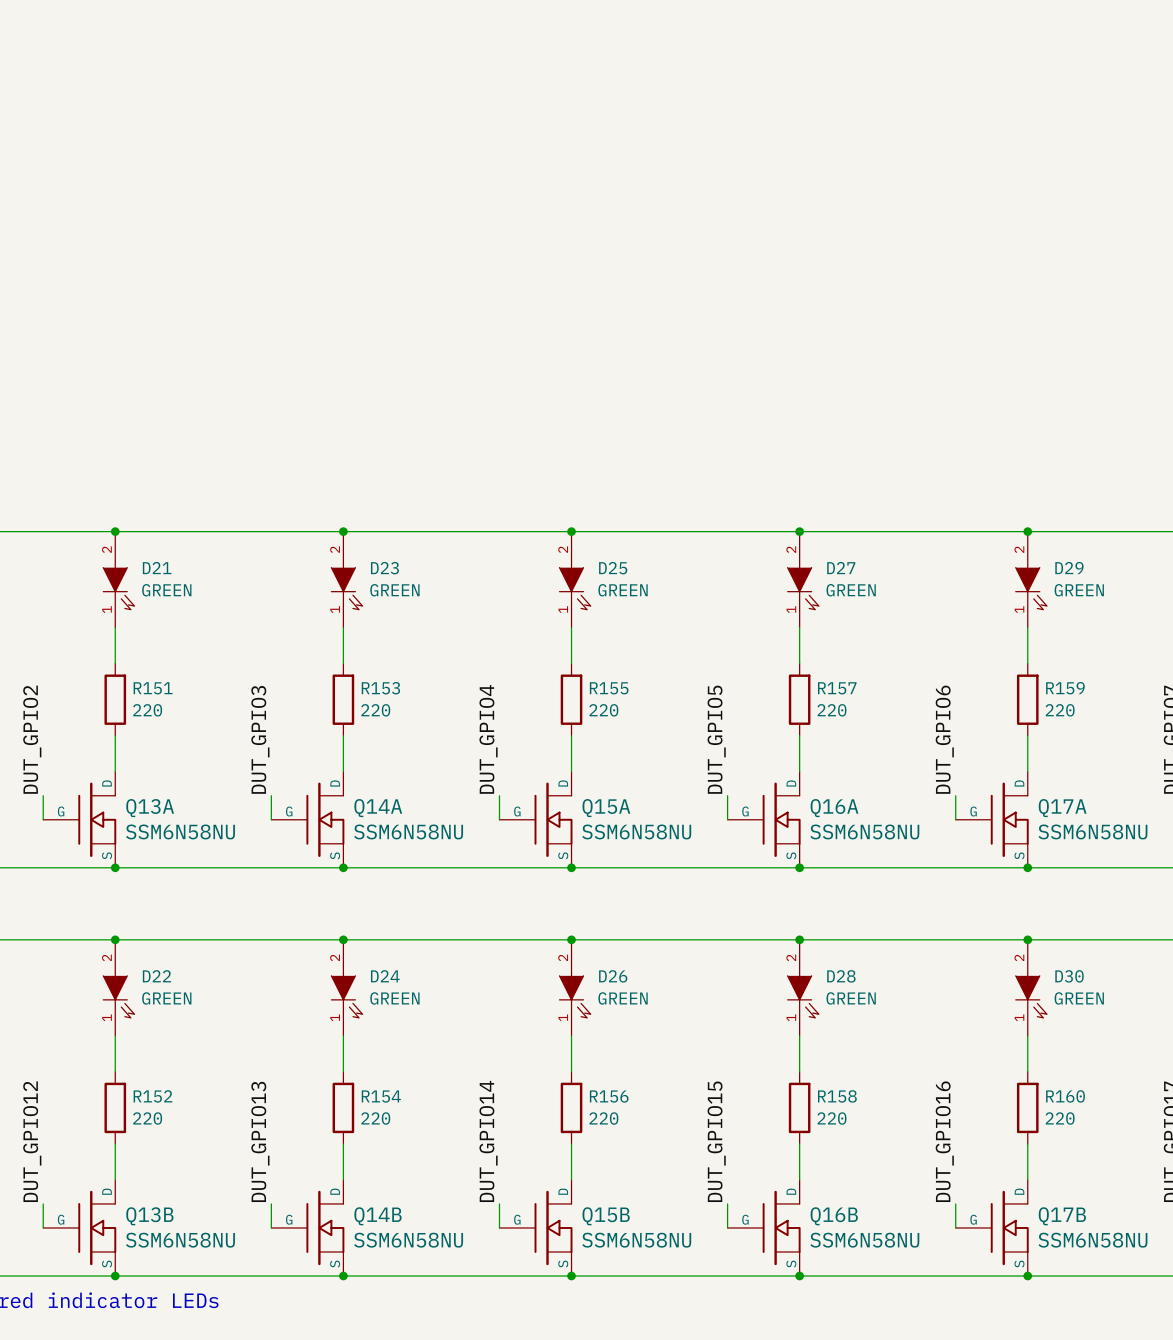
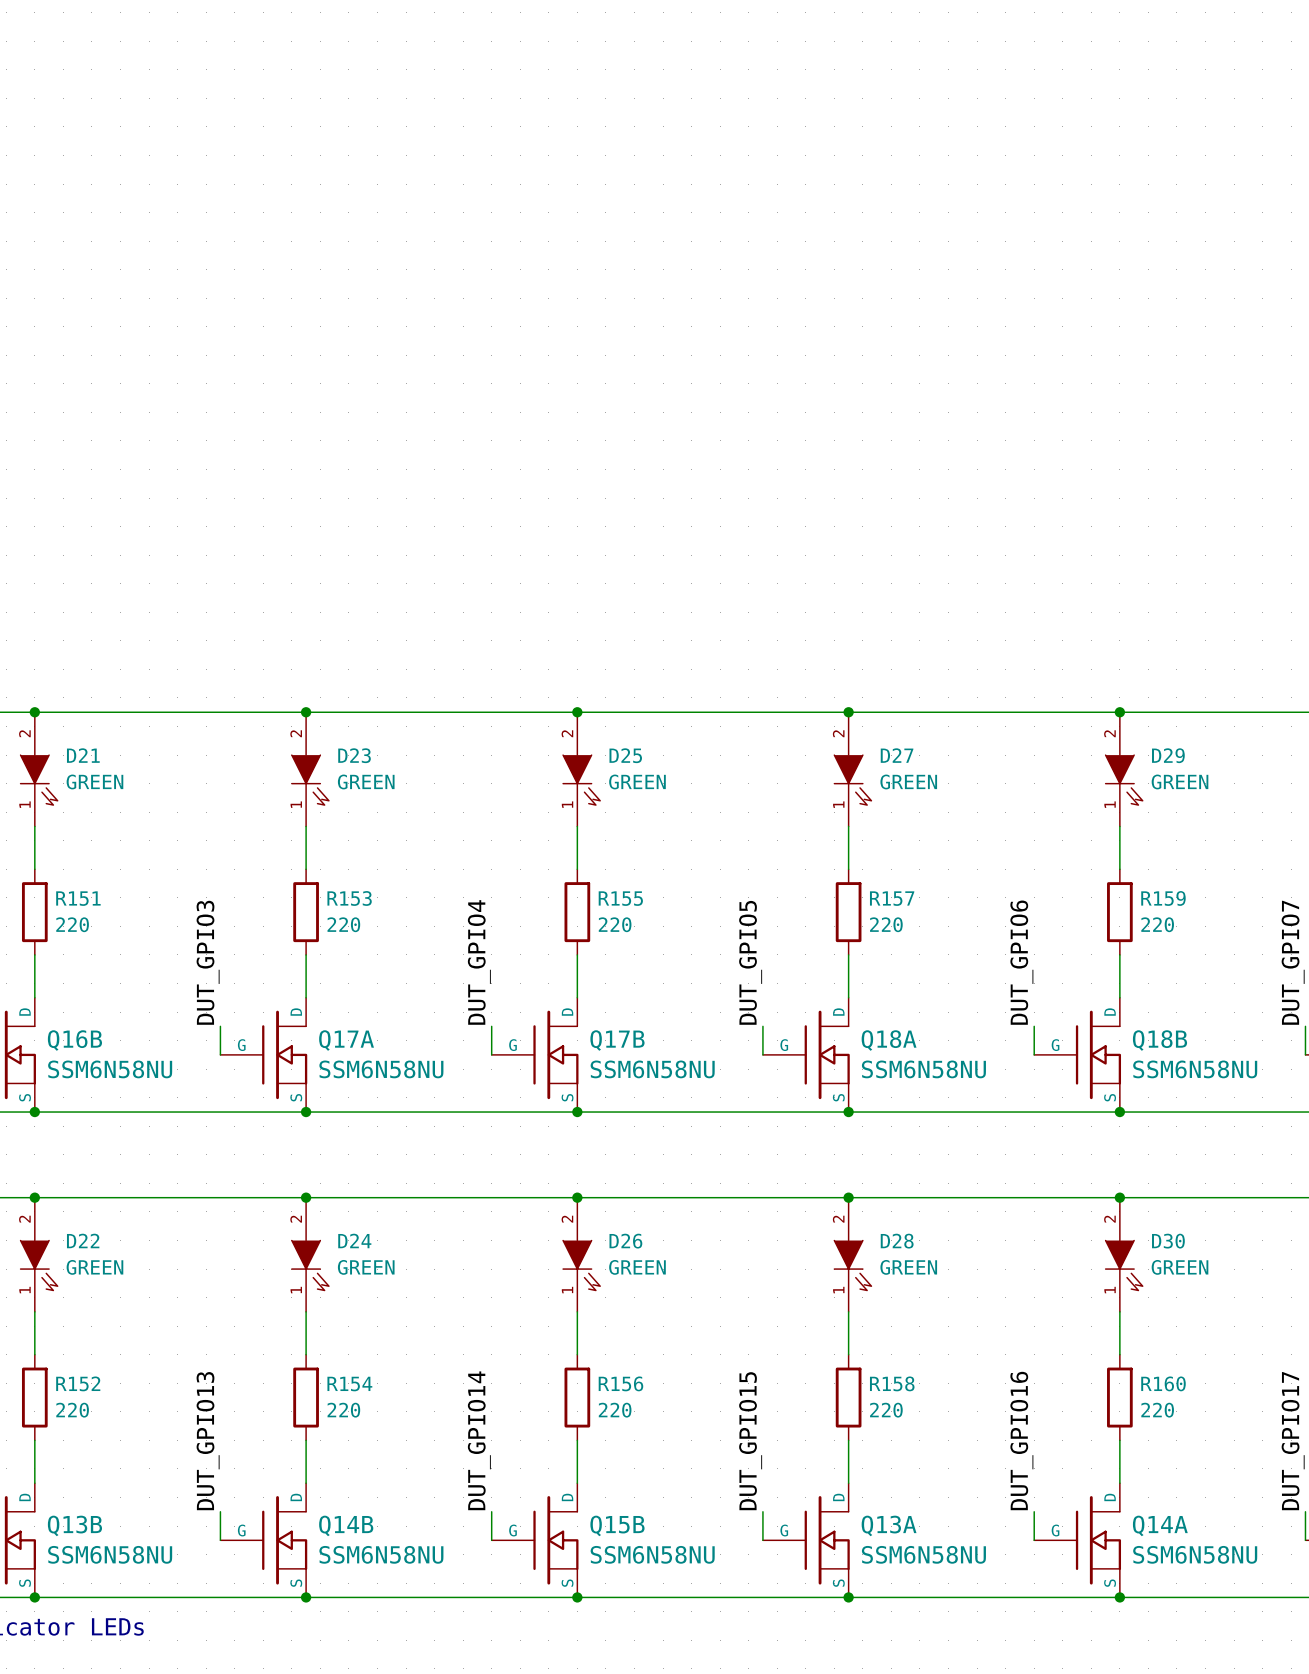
Q13A name: Q13A (150, 808) -> Q16B (74, 1040)
Q14A name: Q14A (378, 808) -> Q17A (346, 1040)
Q15A name: Q15A (606, 808) -> Q17B (617, 1040)
Q16A name: Q16A (834, 808) -> Q18A (889, 1040)
Q17A name: Q17A (1062, 808) -> Q18B (1160, 1040)
Q16B name: Q16B (834, 1216) -> Q13A (889, 1525)
Q17B name: Q17B (1062, 1216) -> Q14A (1160, 1525)

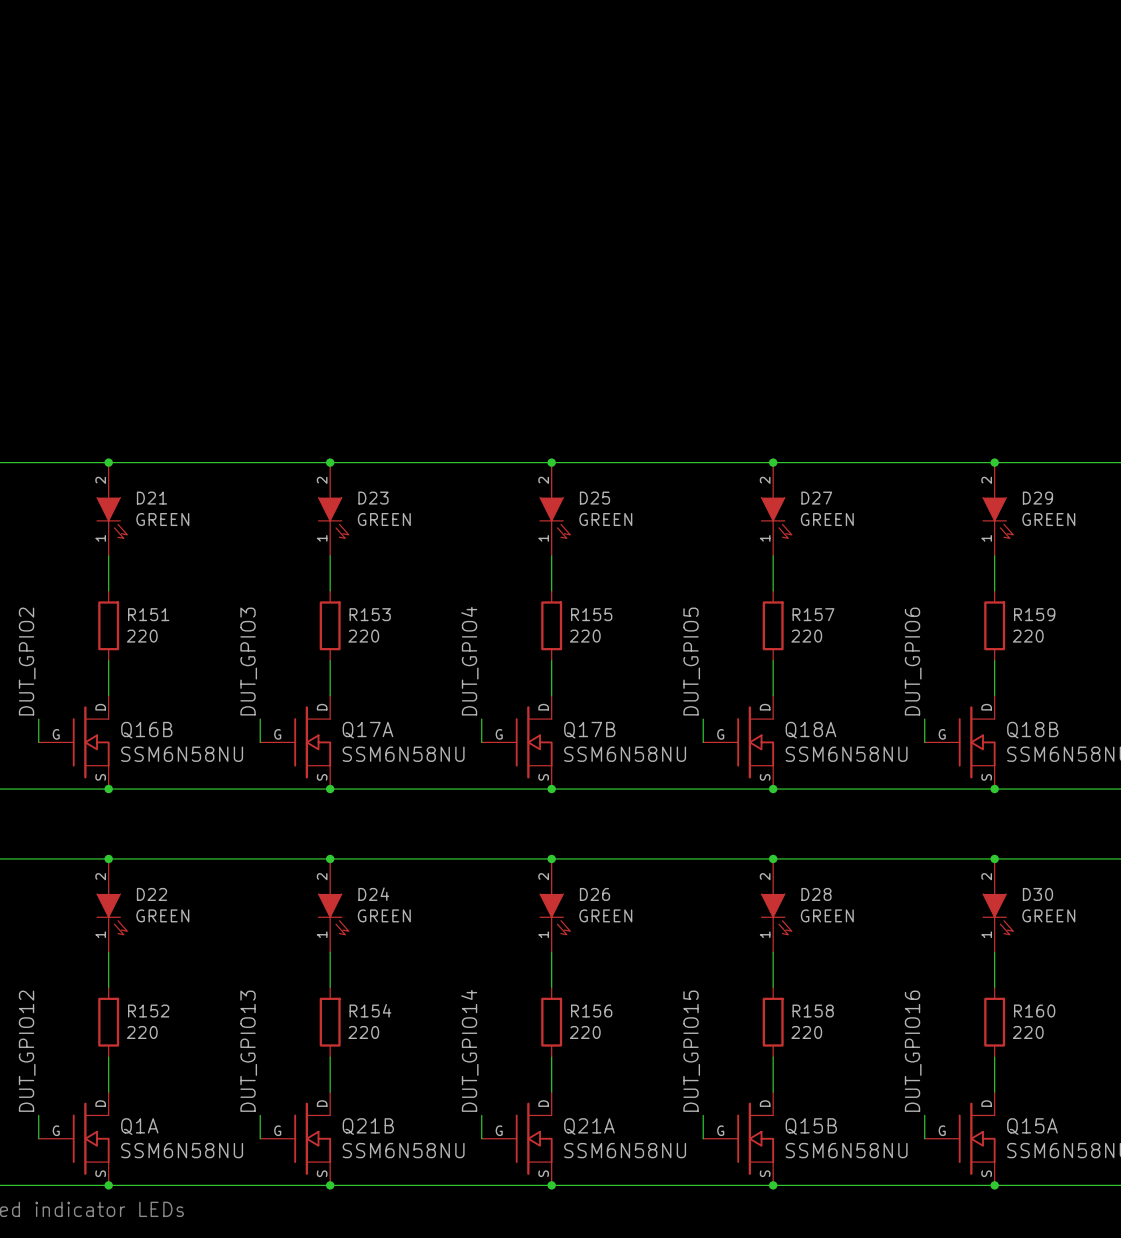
Q13B name: Q13B (74, 1525) -> Q1A (139, 1126)
Q14B name: Q14B (346, 1525) -> Q21B (368, 1126)
Q15B name: Q15B (617, 1525) -> Q21A (589, 1126)
Q13A name: Q13A (889, 1525) -> Q15B (811, 1126)
Q14A name: Q14A (1160, 1525) -> Q15A (1032, 1126)

